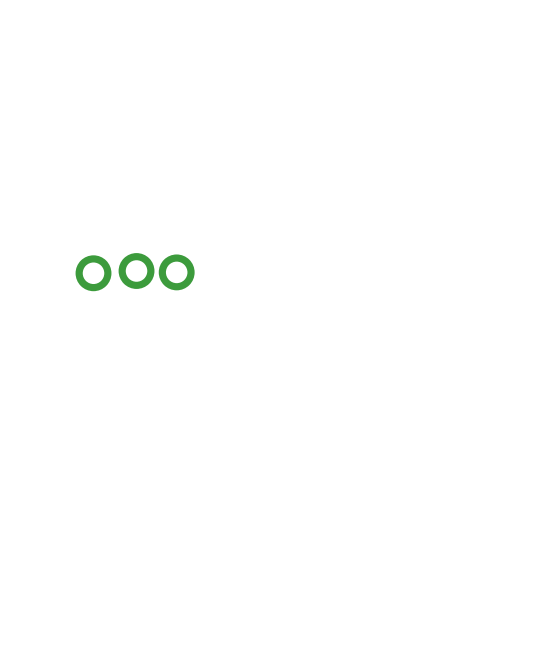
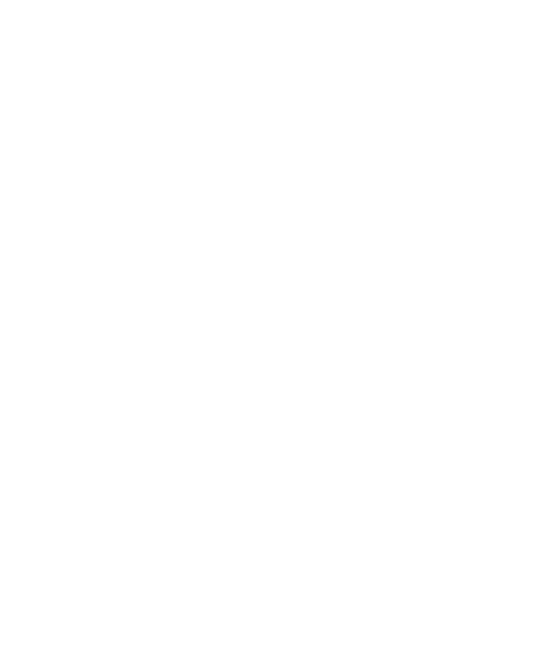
via: (136, 271) -> none
via: (176, 272) -> none
via: (93, 273) -> none

